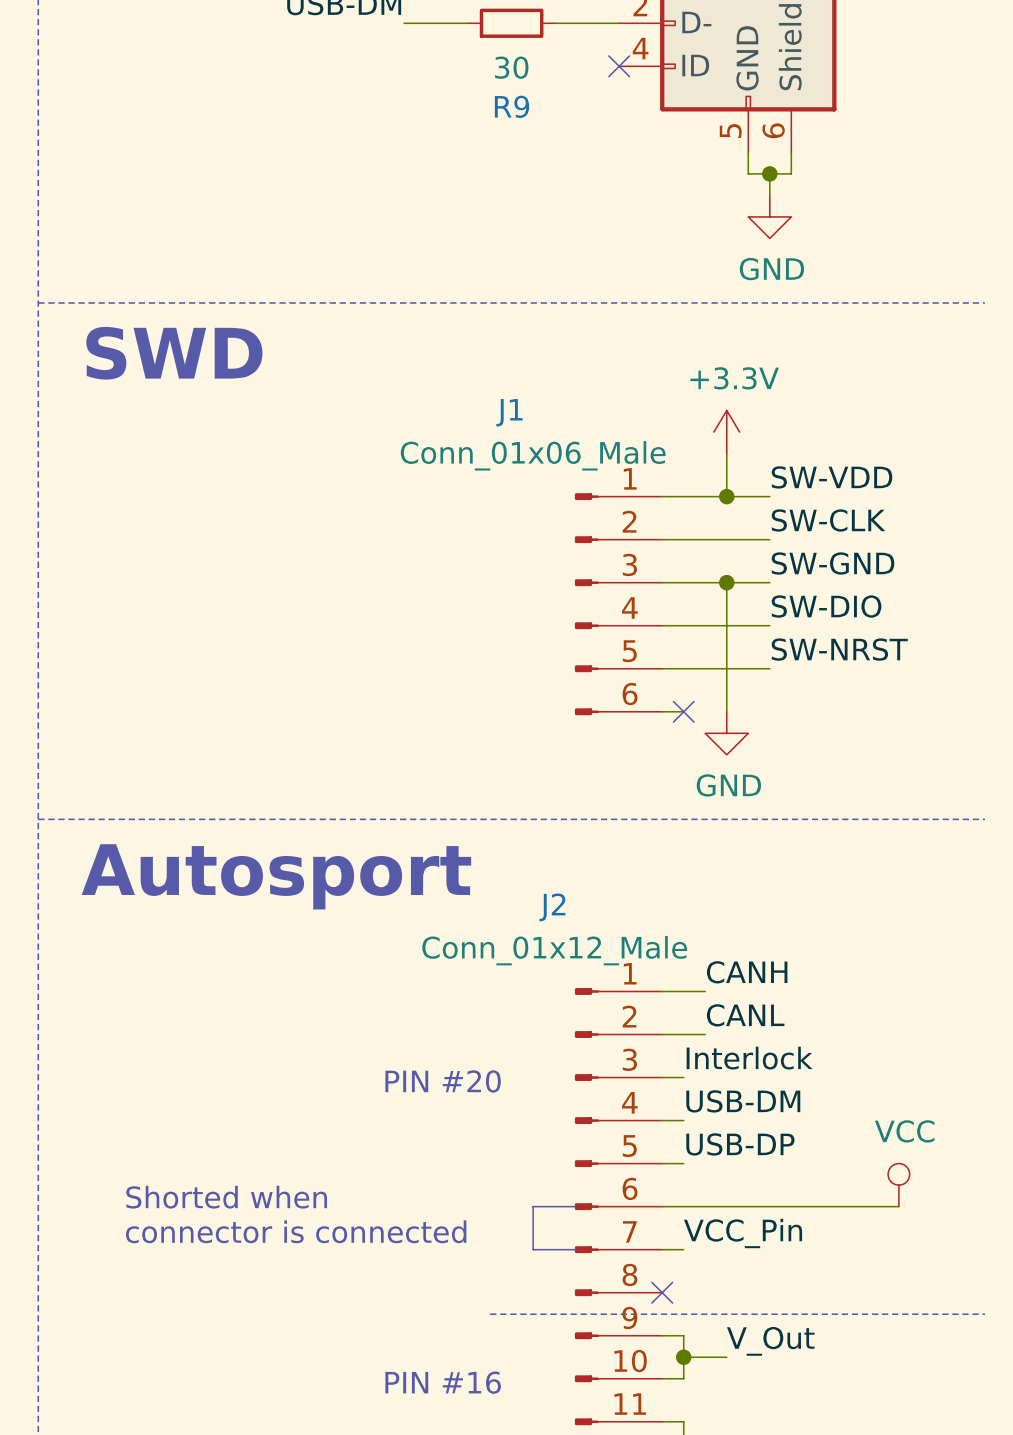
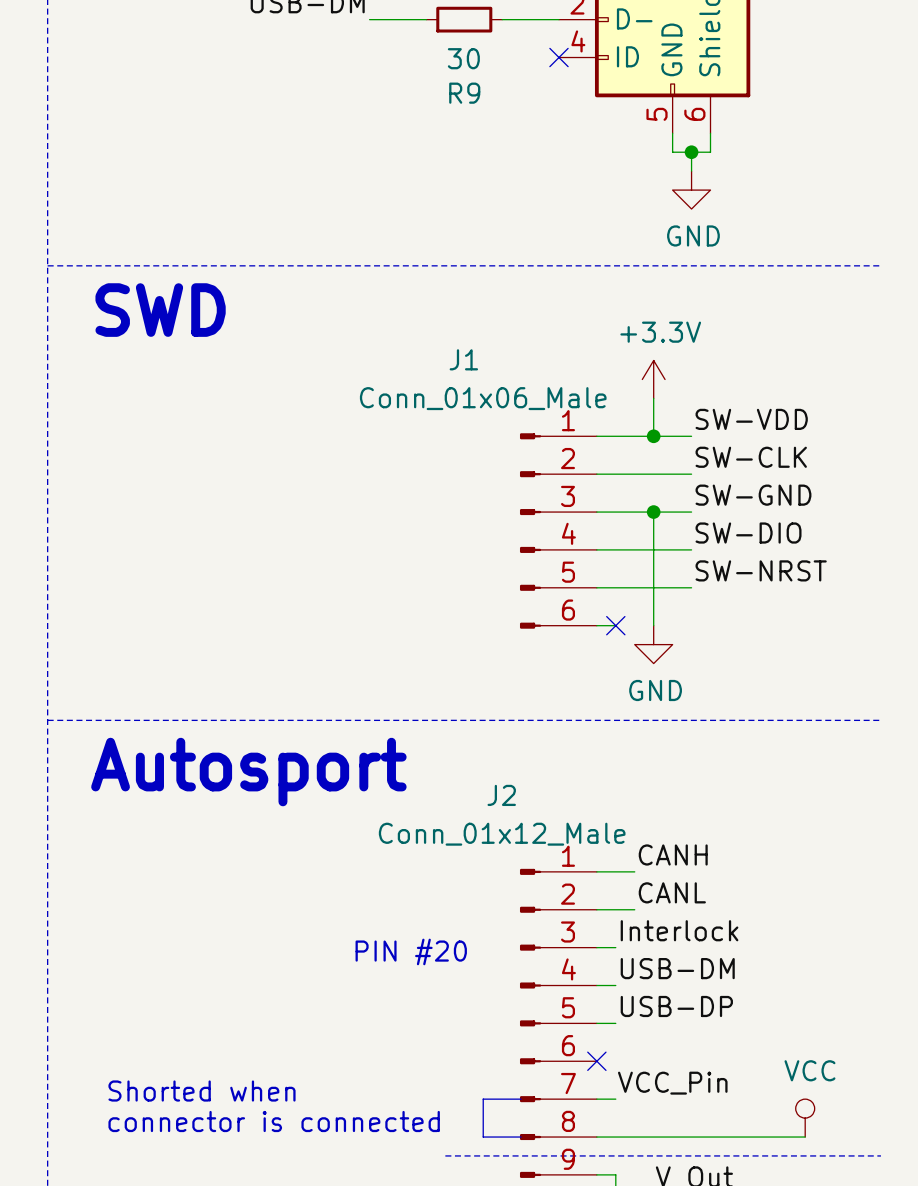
power symbol position: VCC (898, 1185) -> VCC (805, 1118)
text position: Shorted when (226, 1197) -> Shorted when (202, 1091)
bus: (576, 1206) (533, 1206) (533, 1249) -> (521, 1137) (483, 1137) (483, 1099)
wire: (662, 1206) (898, 1206) -> (596, 1137) (805, 1137)
text position: connector is connected (296, 1231) -> connector is connected (274, 1121)
no-connect mark position: (662, 1292) -> (596, 1061)

